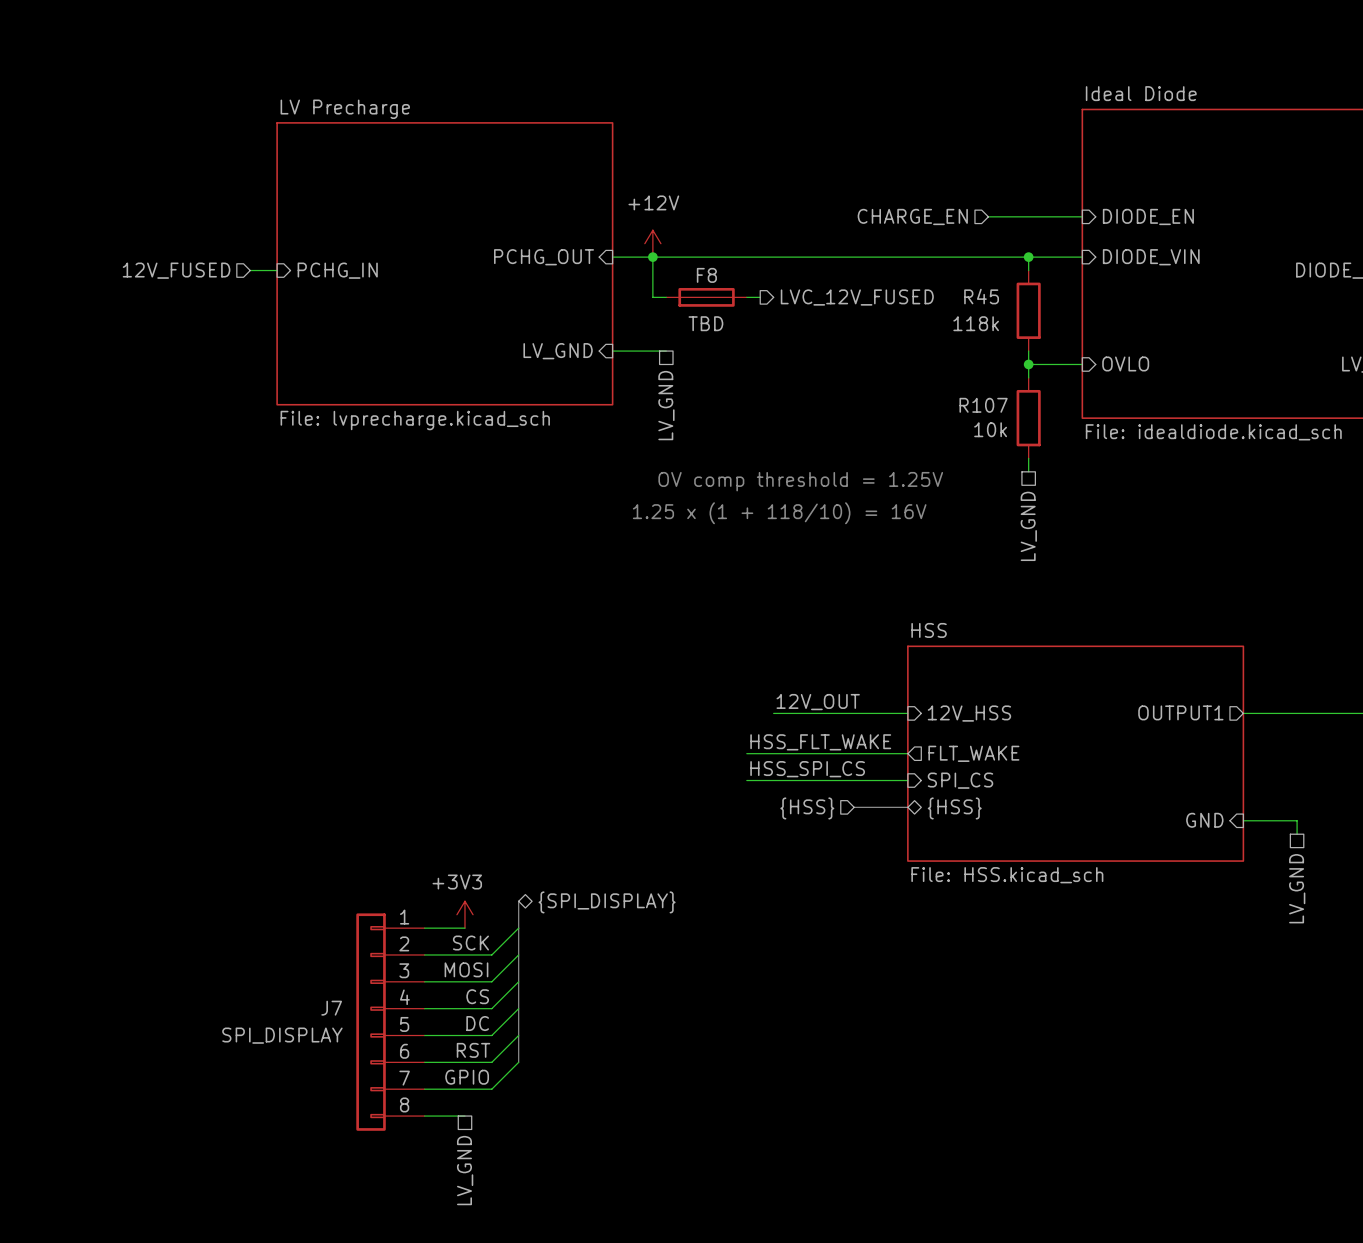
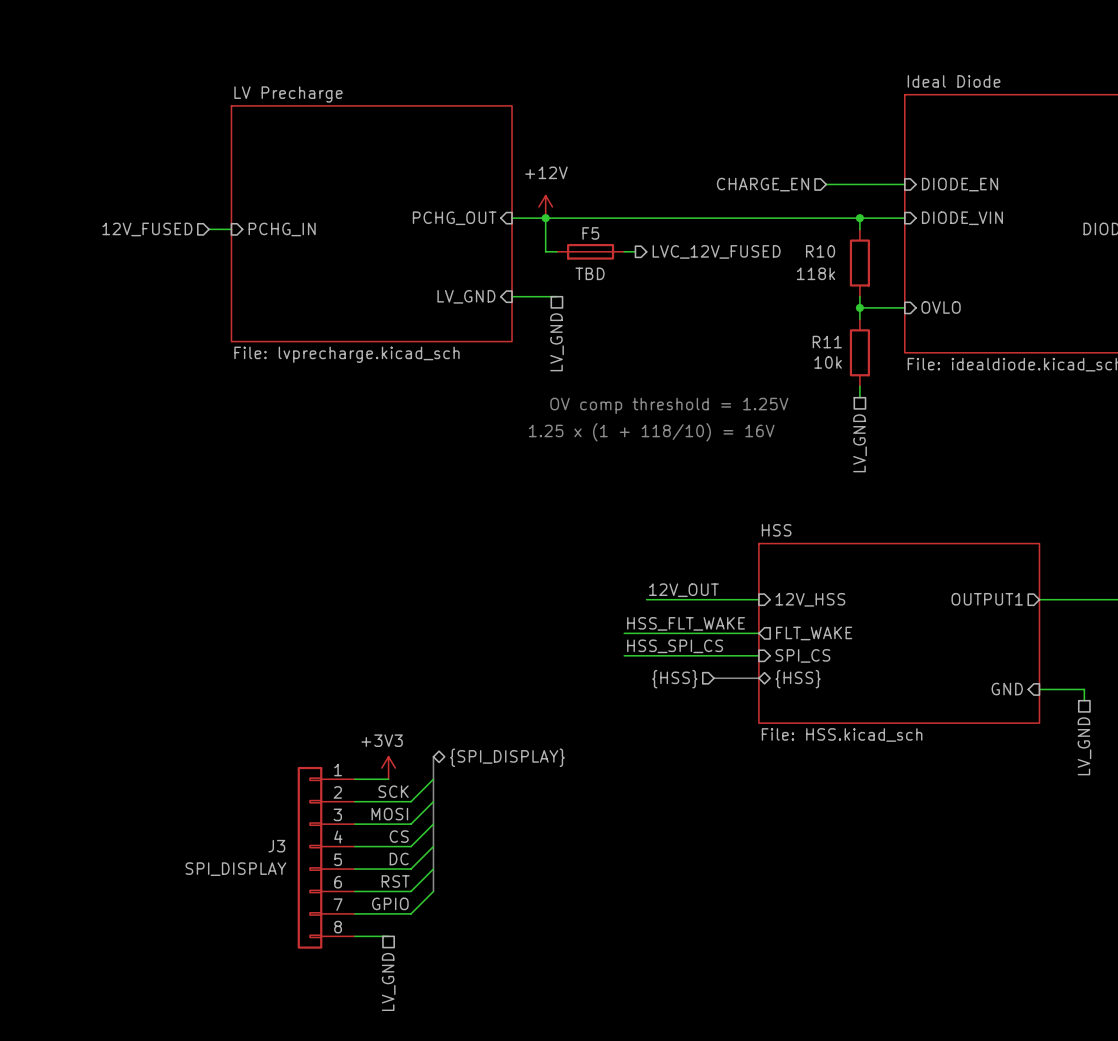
F8 name: F8 (706, 275) -> F5 (590, 233)
R45 name: R45 (981, 296) -> R10 (820, 251)
R107 name: R107 (983, 405) -> R11 (827, 342)
J7 name: J7 (331, 1008) -> J3 (276, 846)

